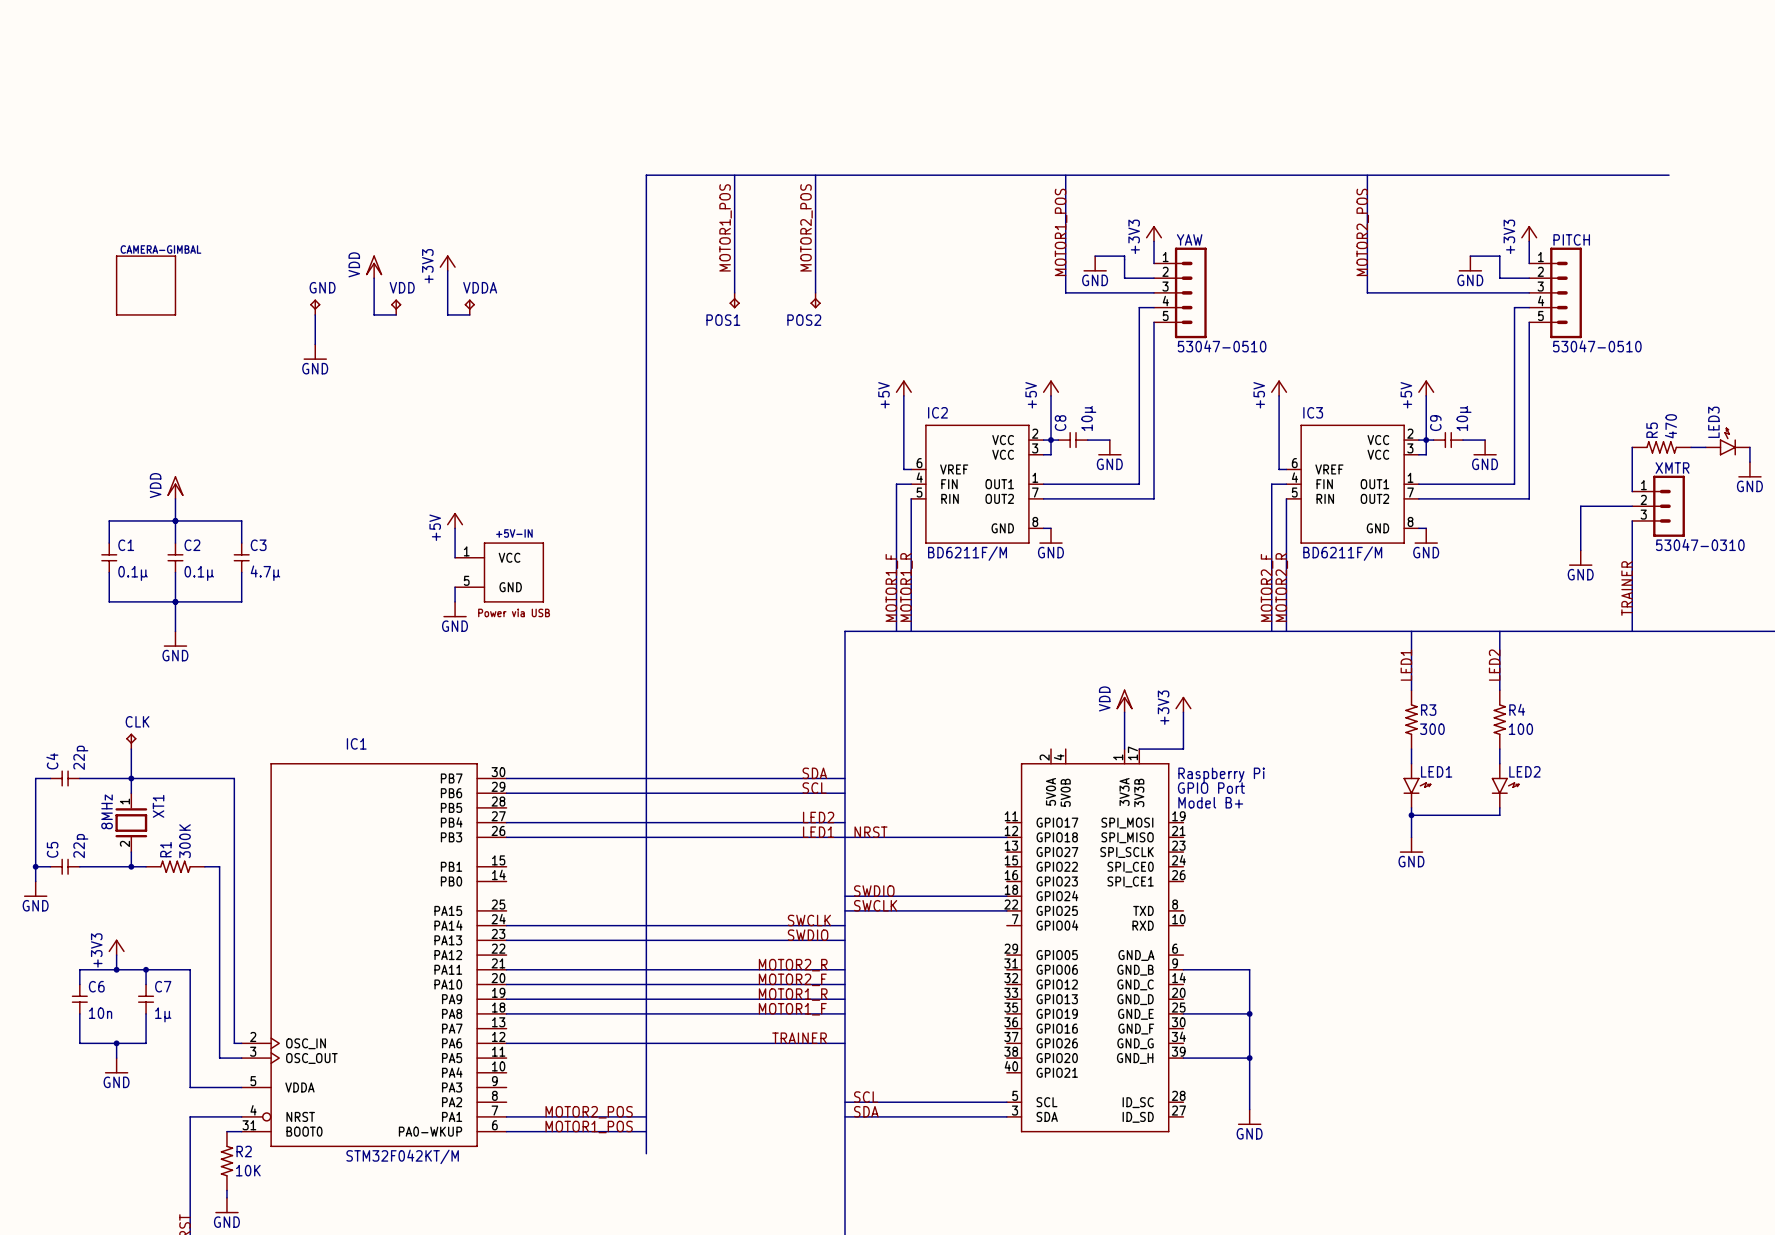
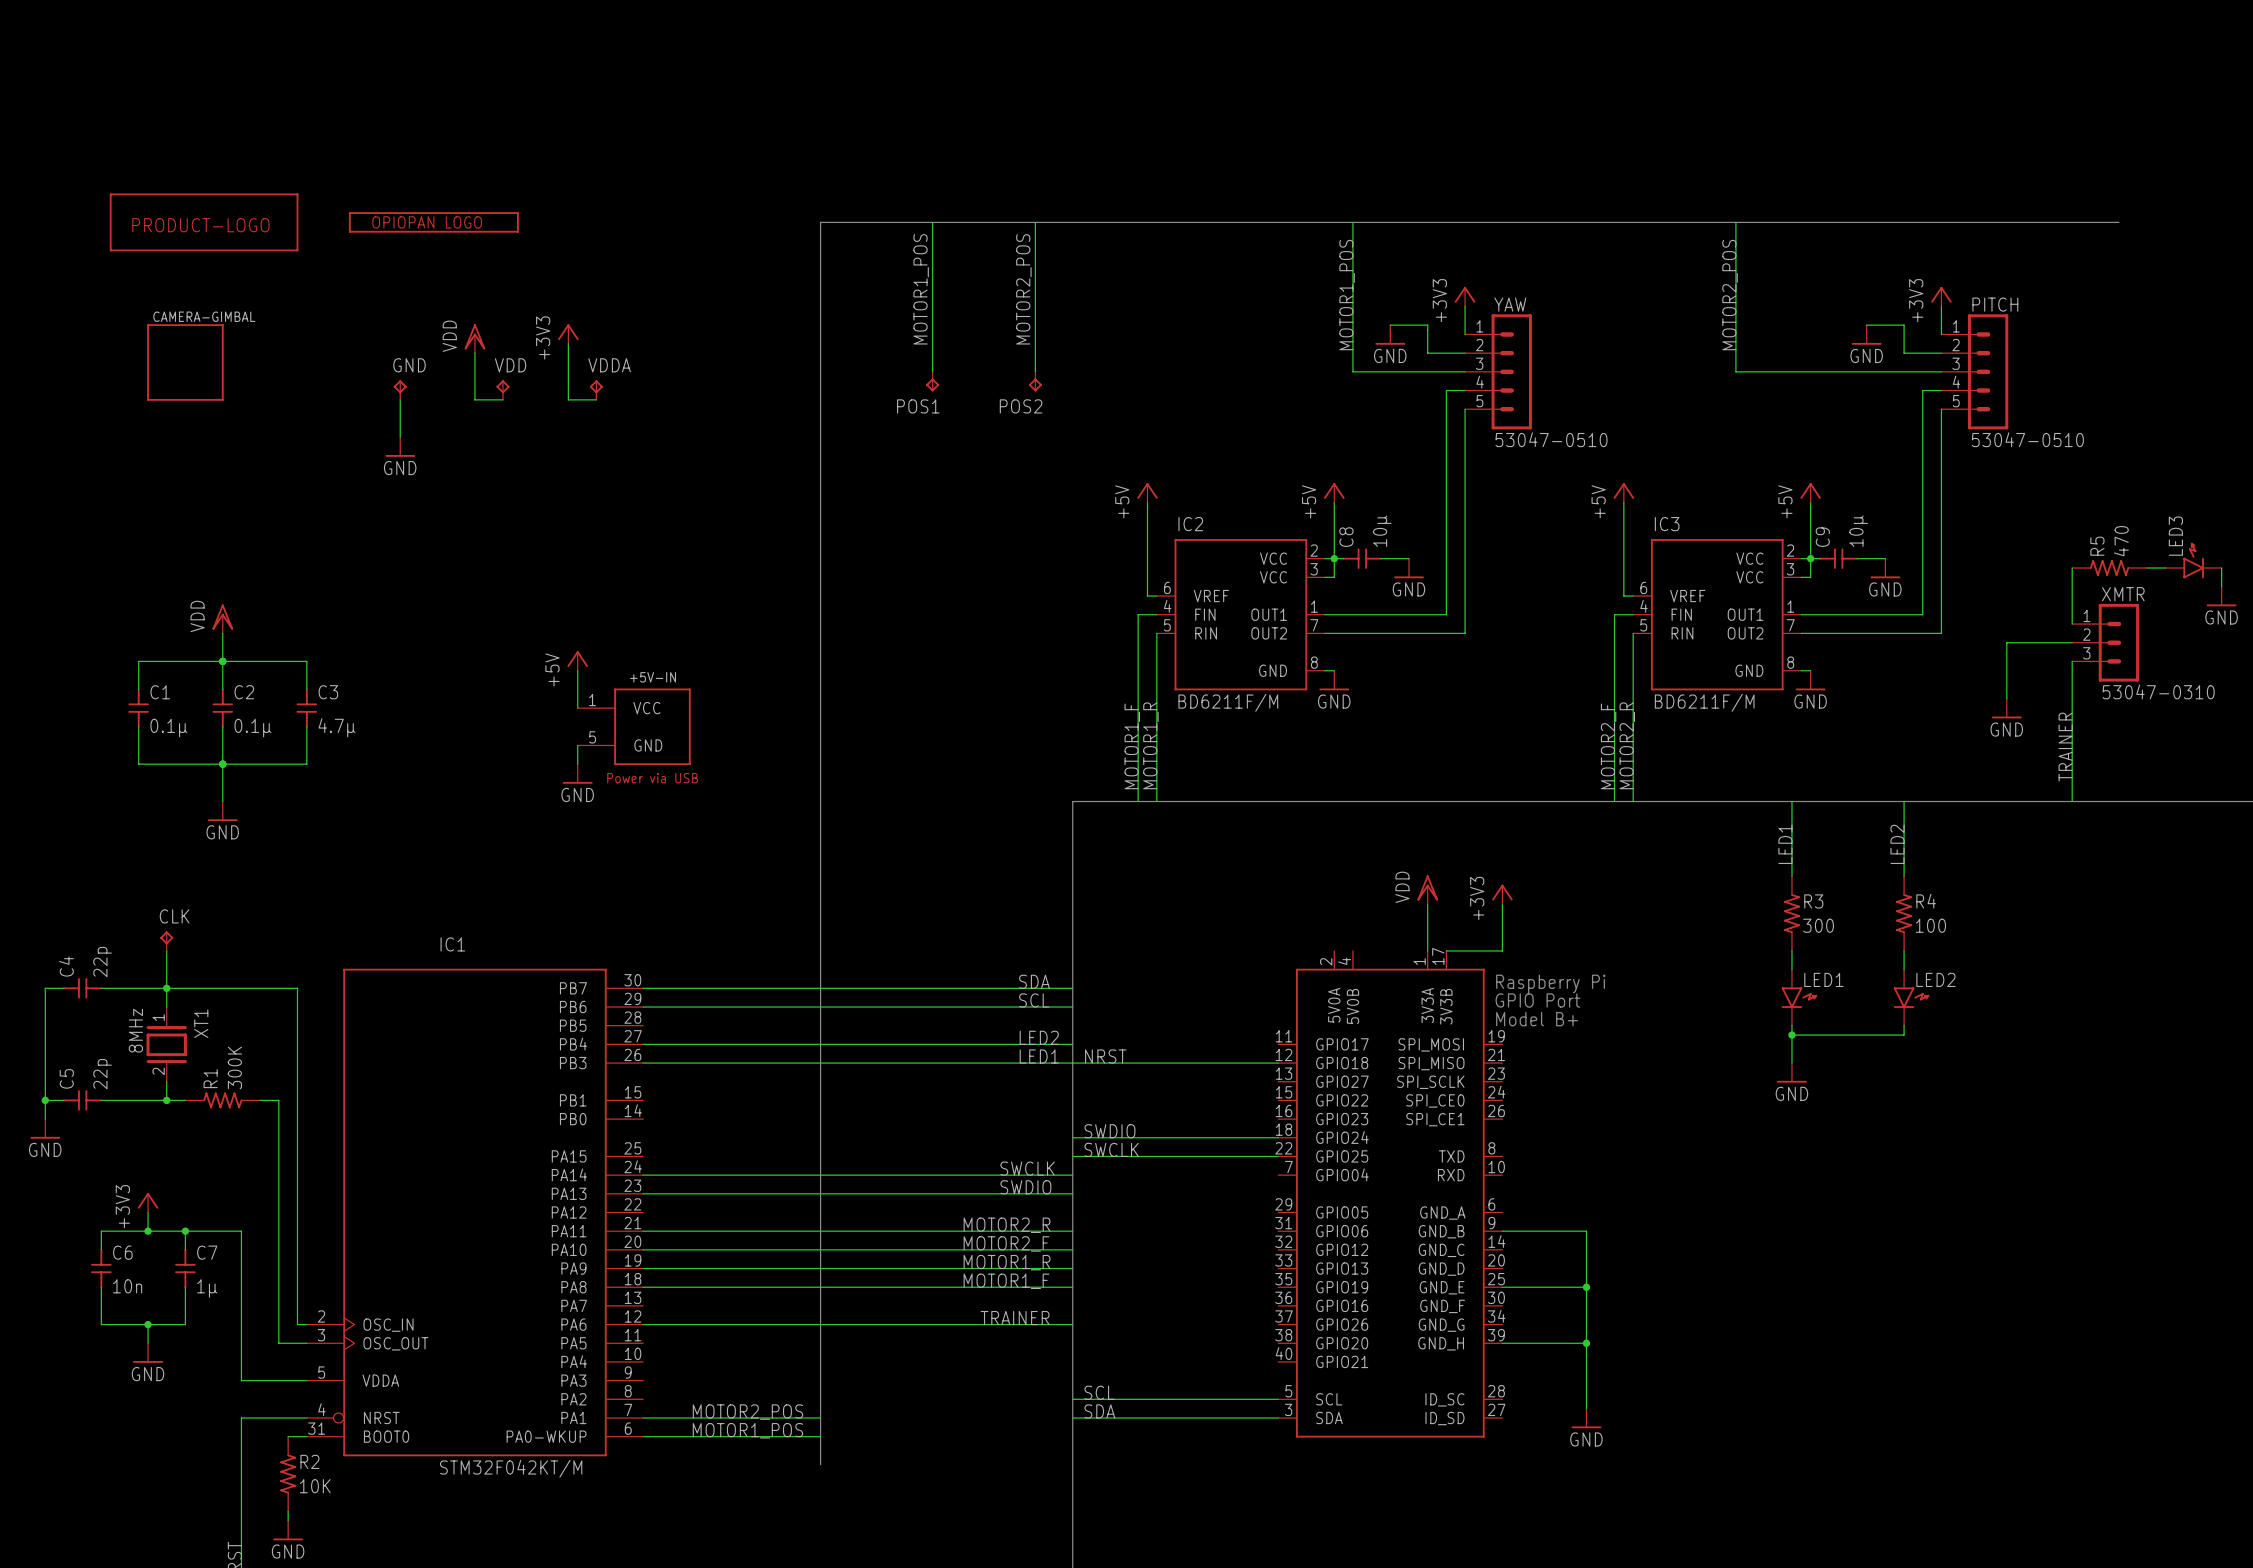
part: none -> (204, 222)
part: none -> (433, 222)

